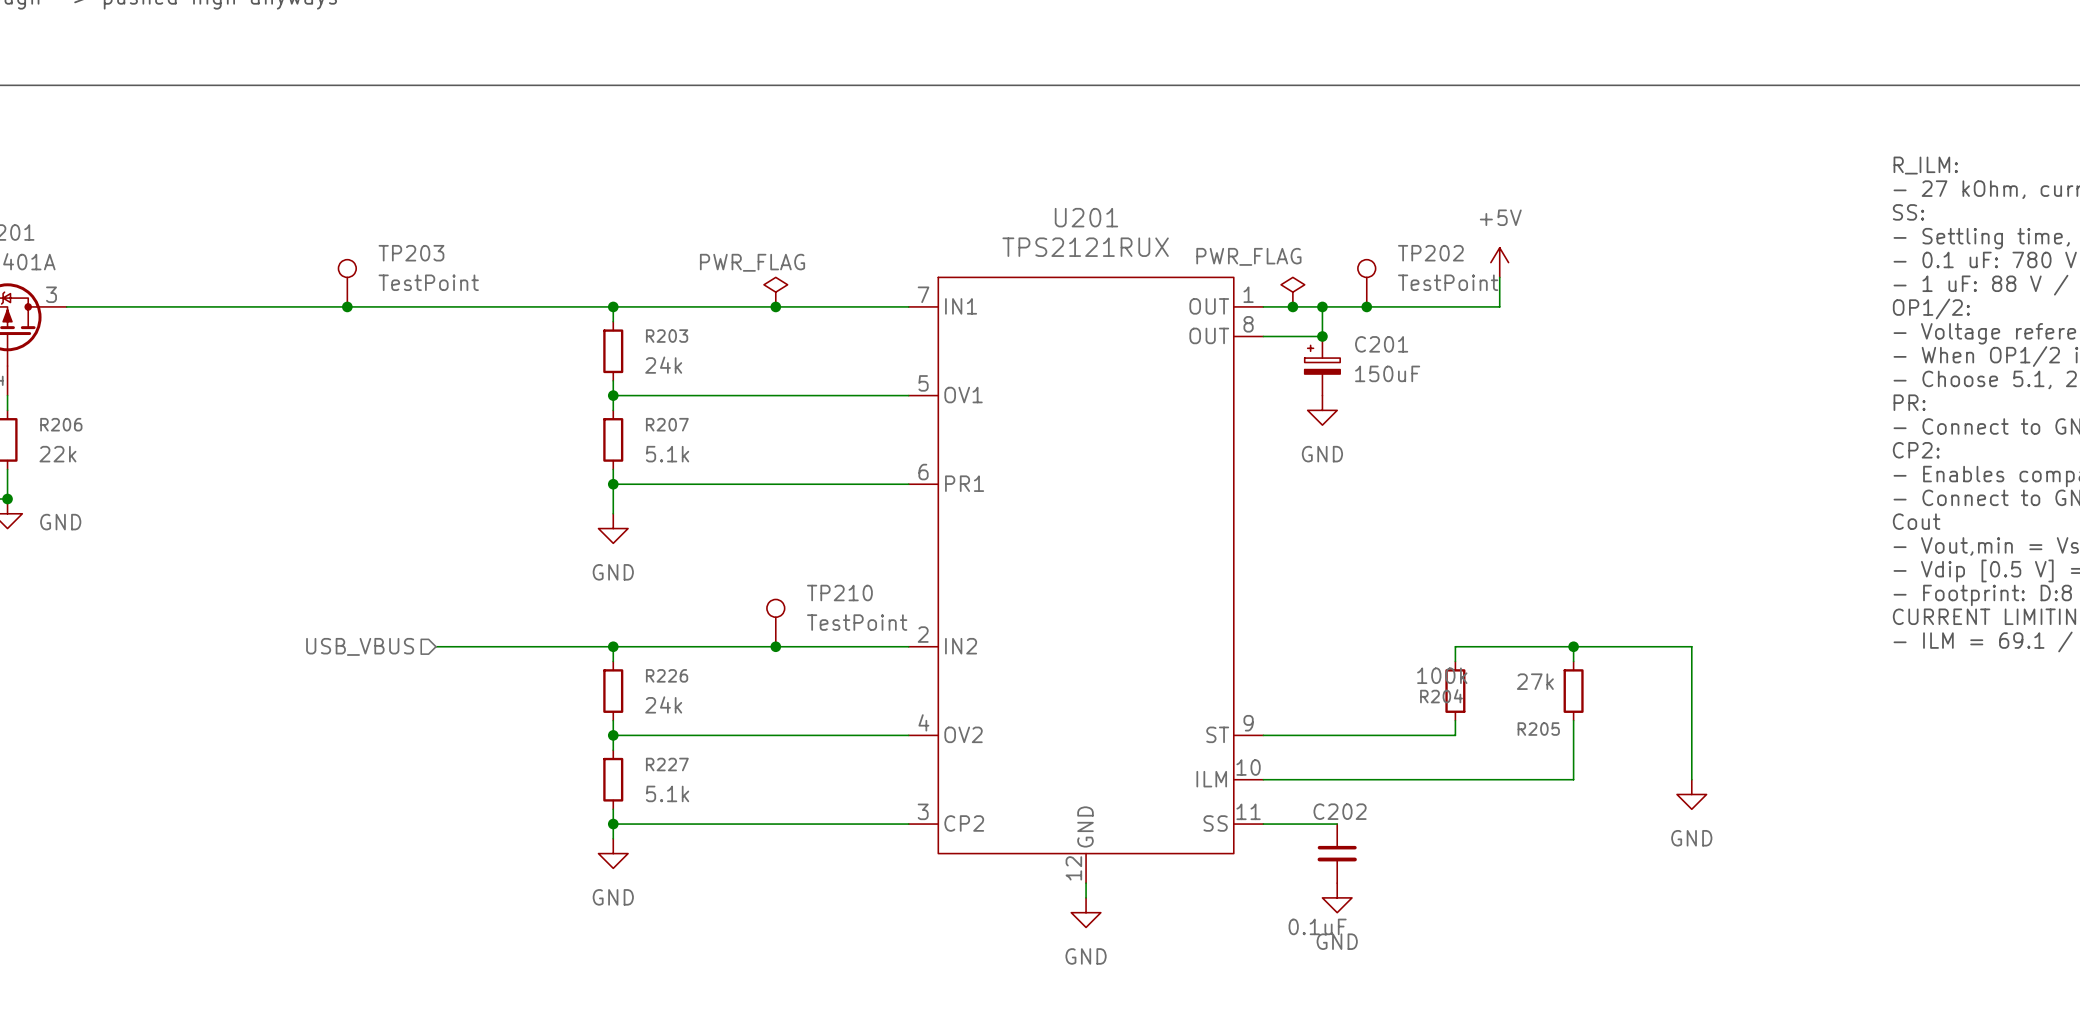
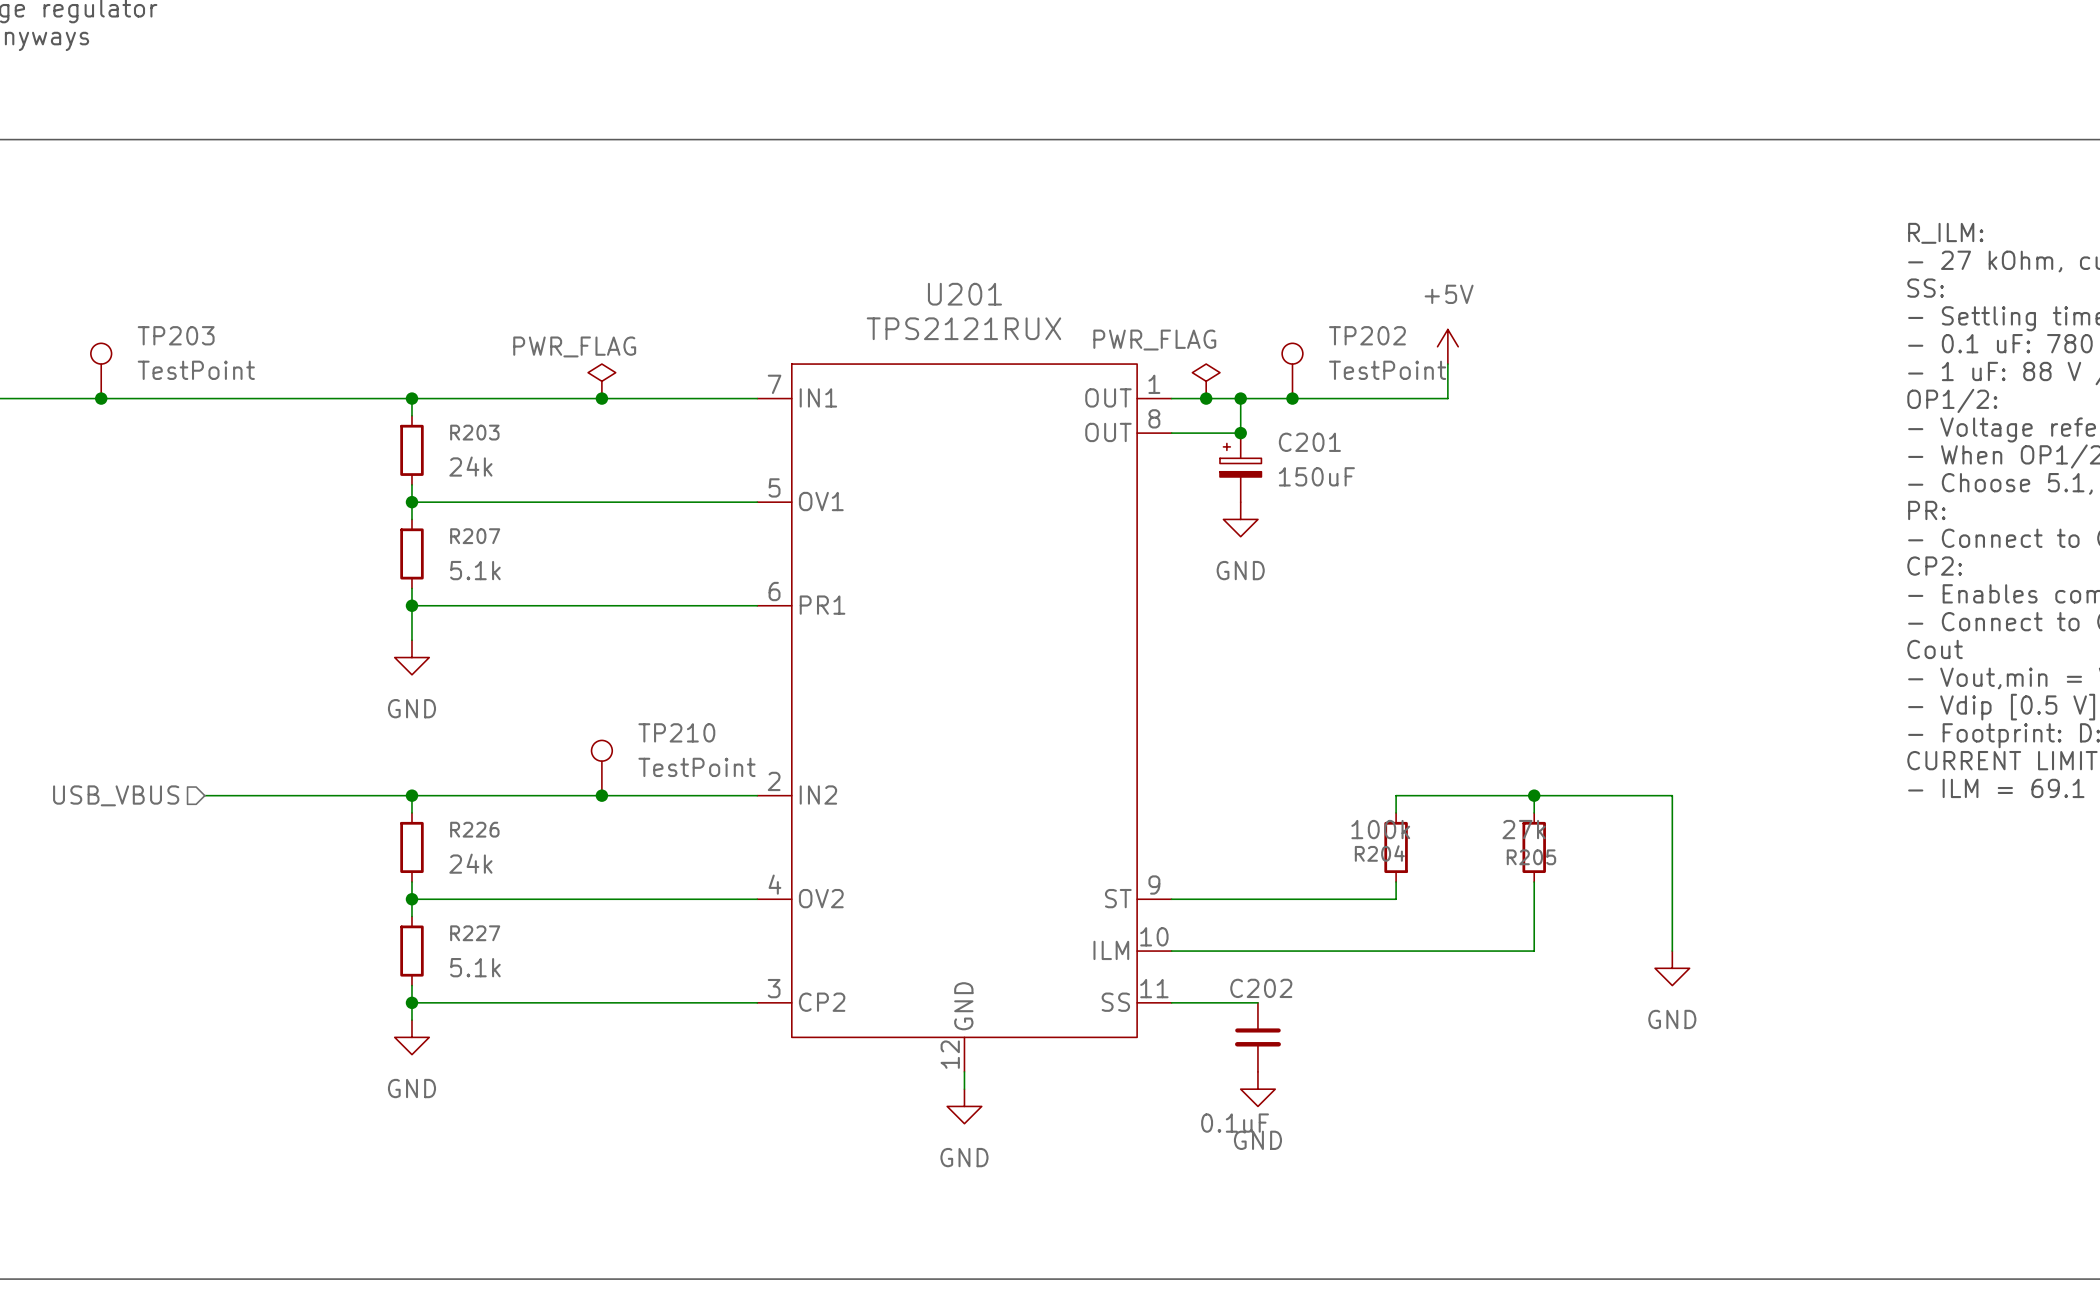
R205 value position: 27k (1535, 681) -> 27k (1524, 829)
R205 name position: R205 (1538, 729) -> R205 (1531, 857)

